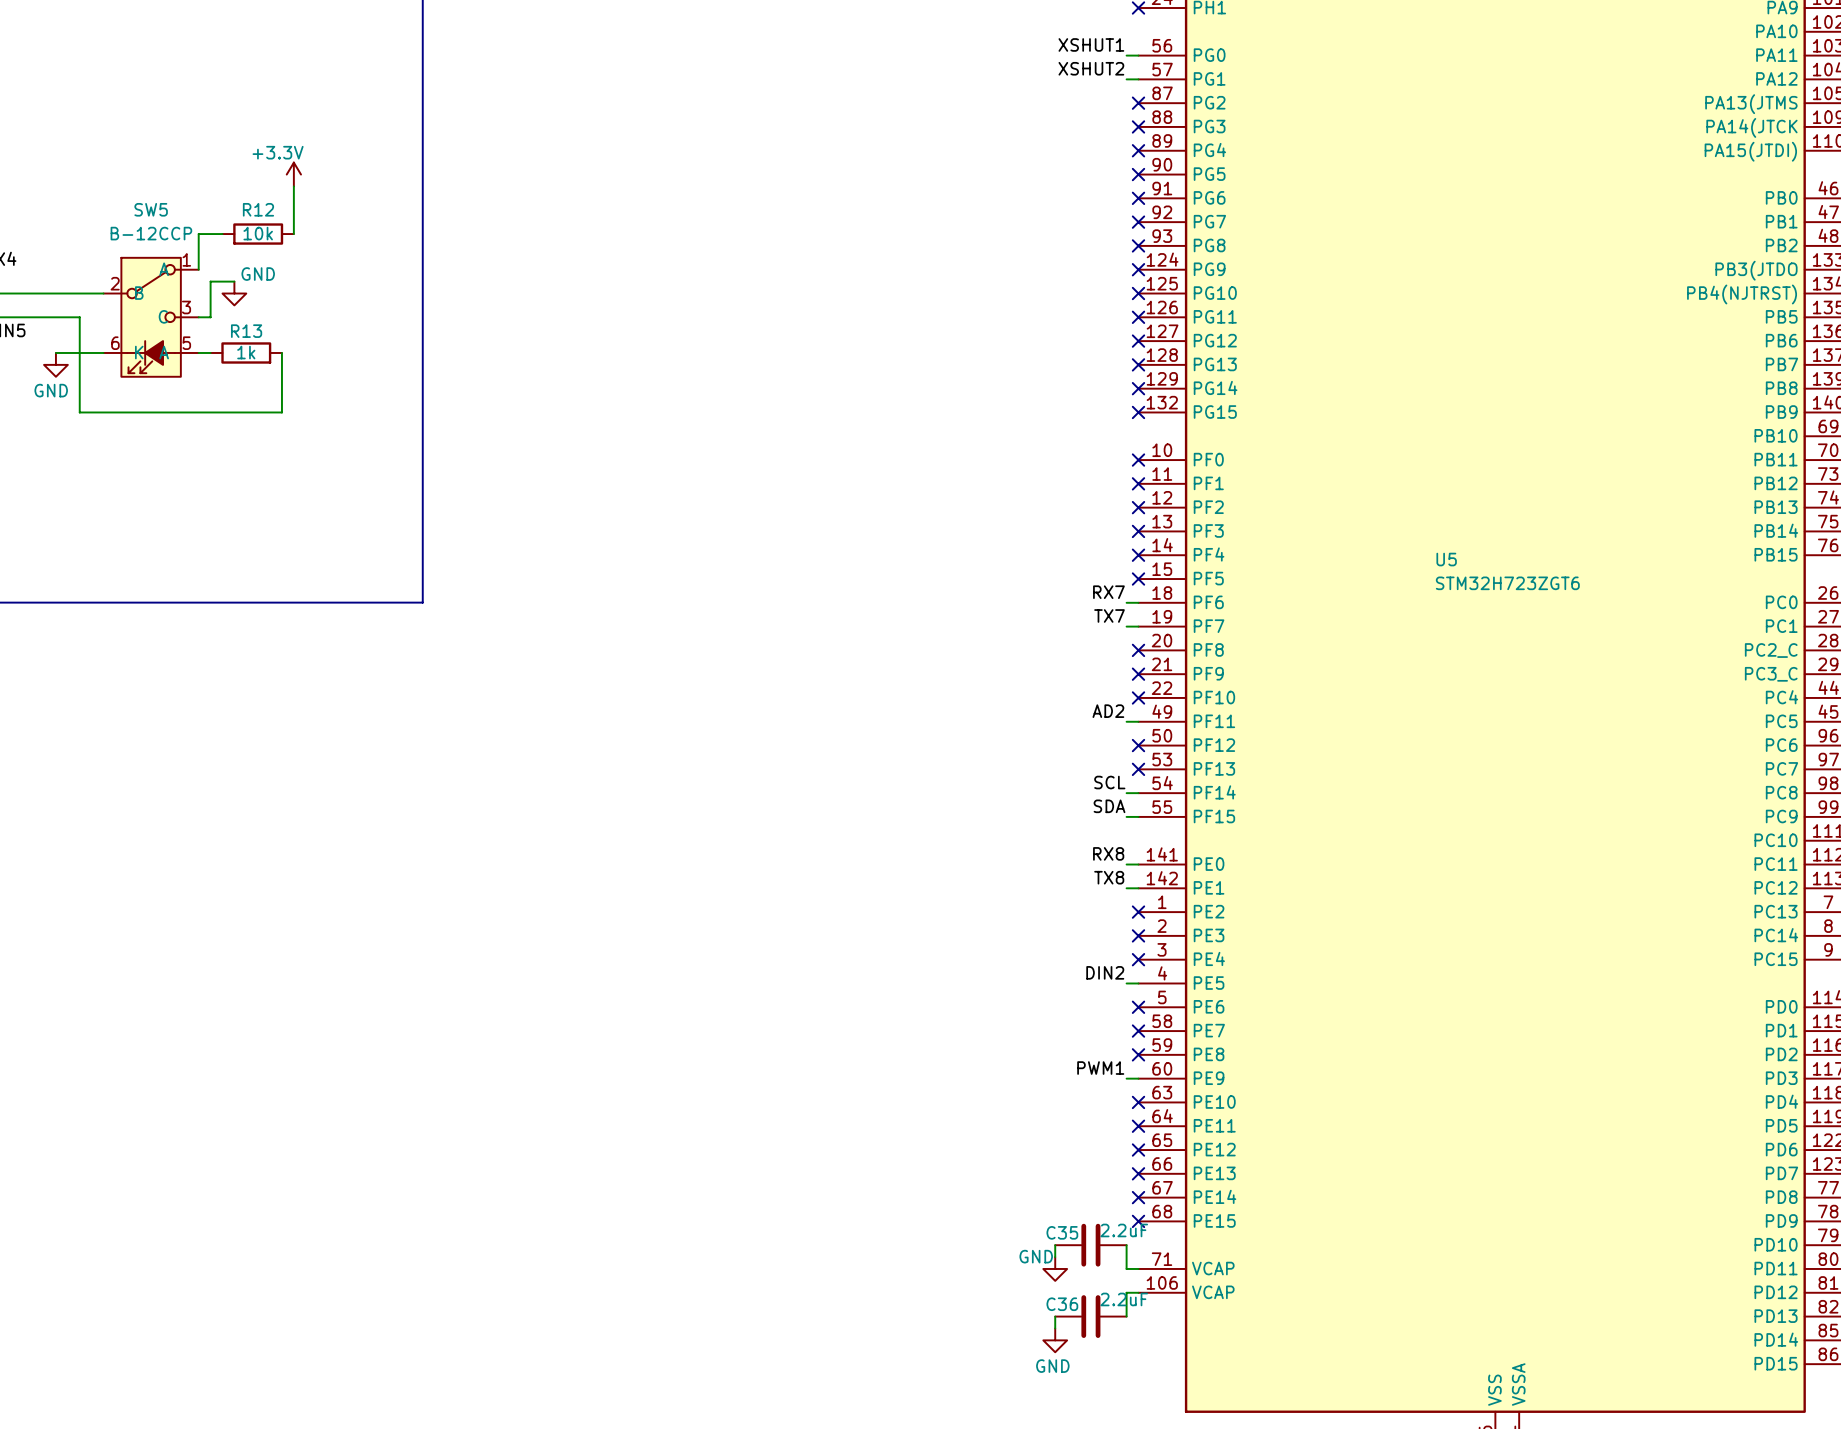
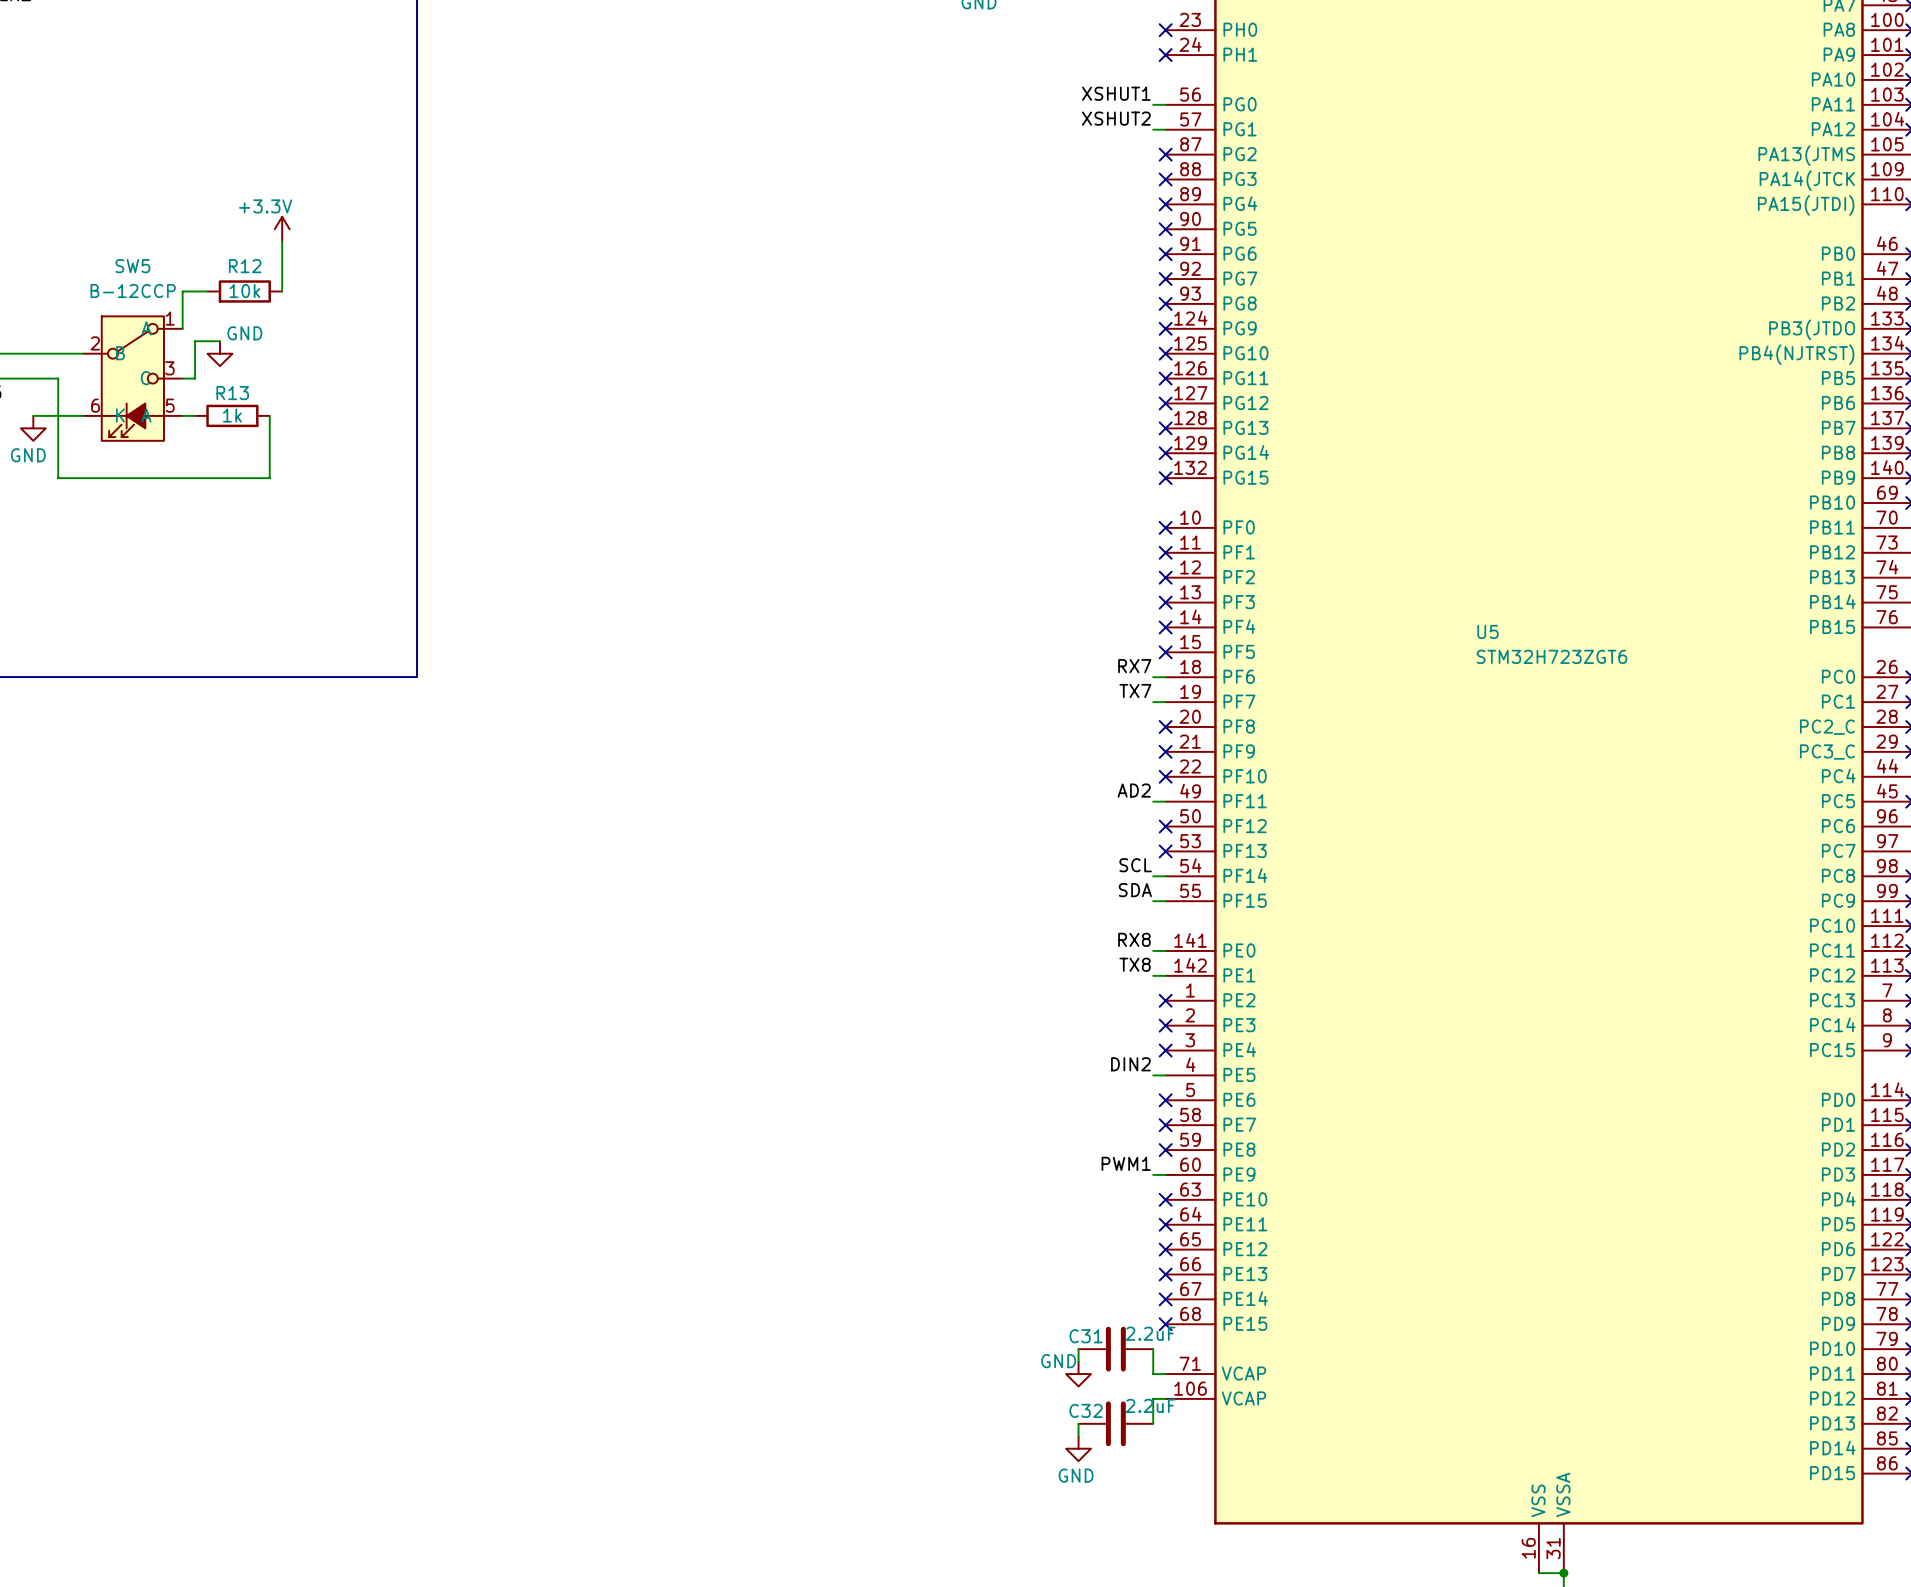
C35 name: C35 (1062, 1232) -> C31 (1086, 1336)
C36 name: C36 (1062, 1304) -> C32 (1086, 1410)

